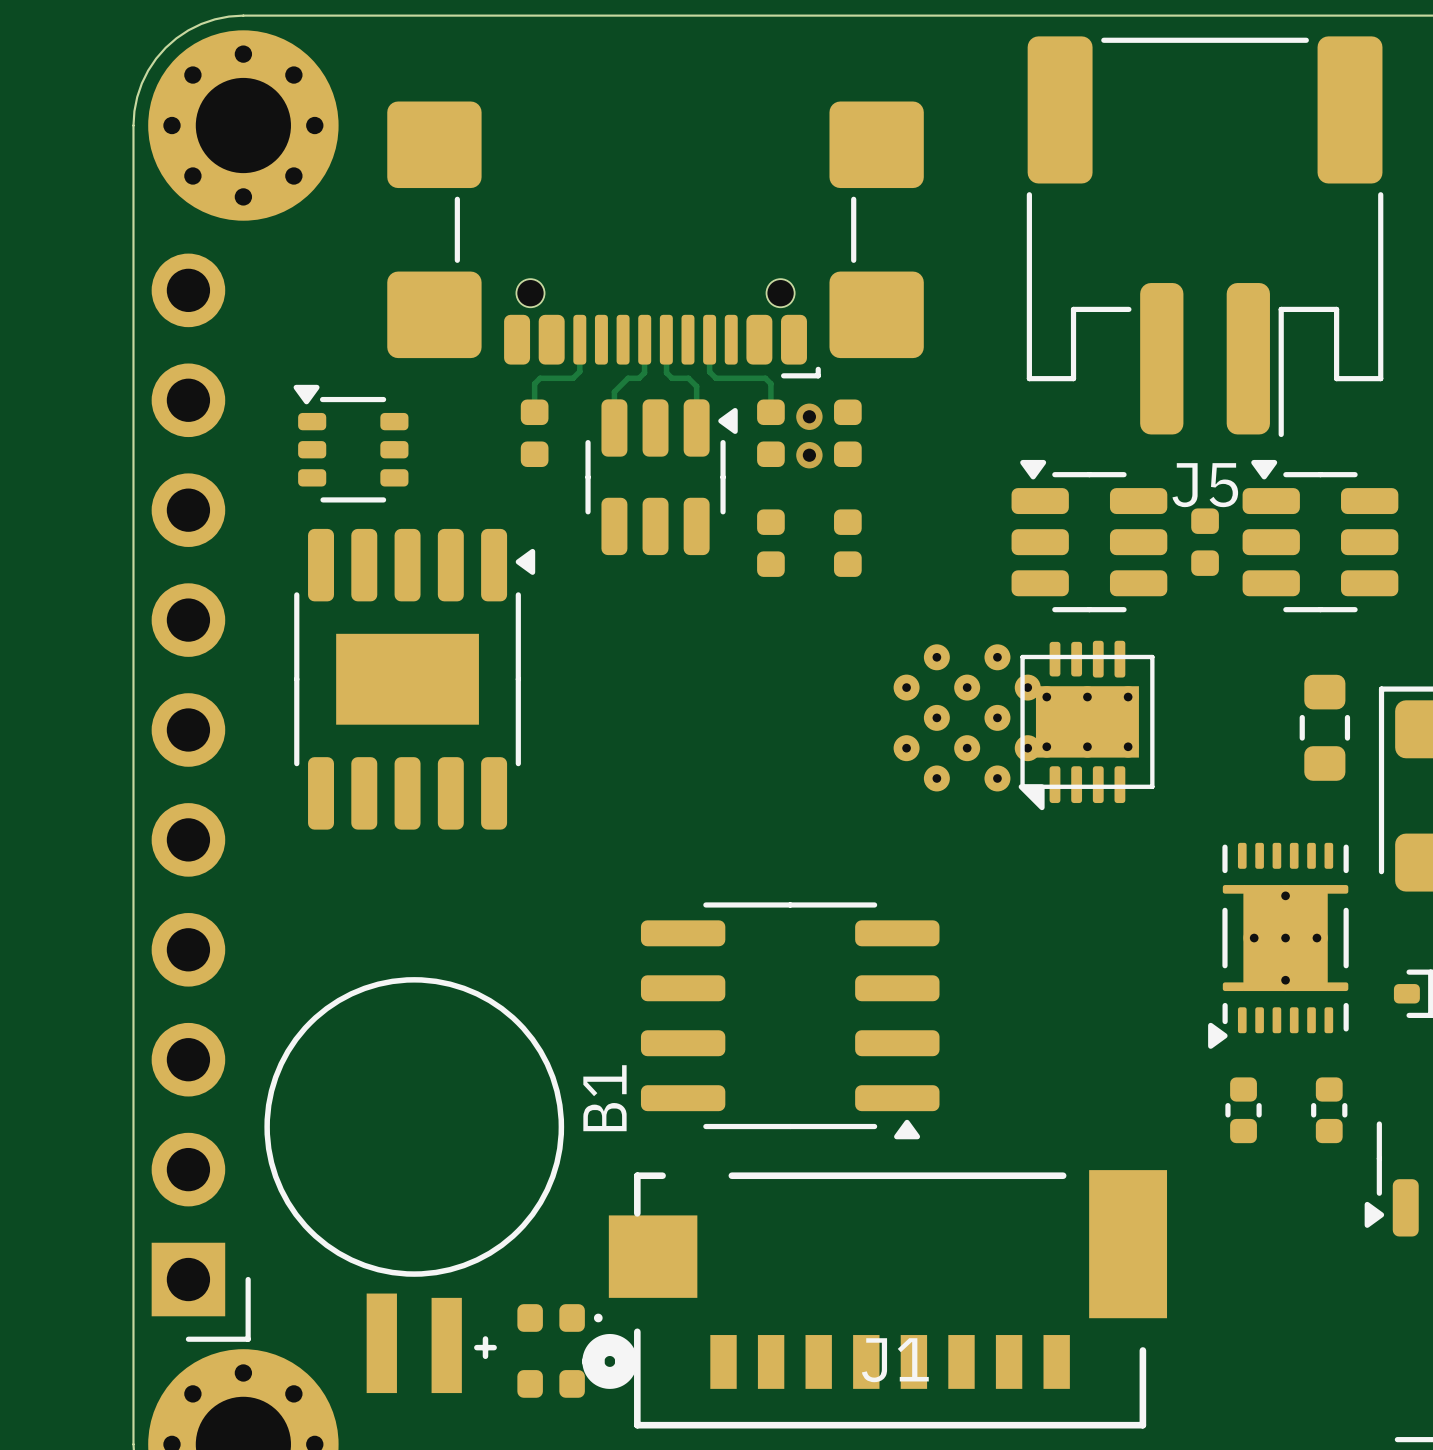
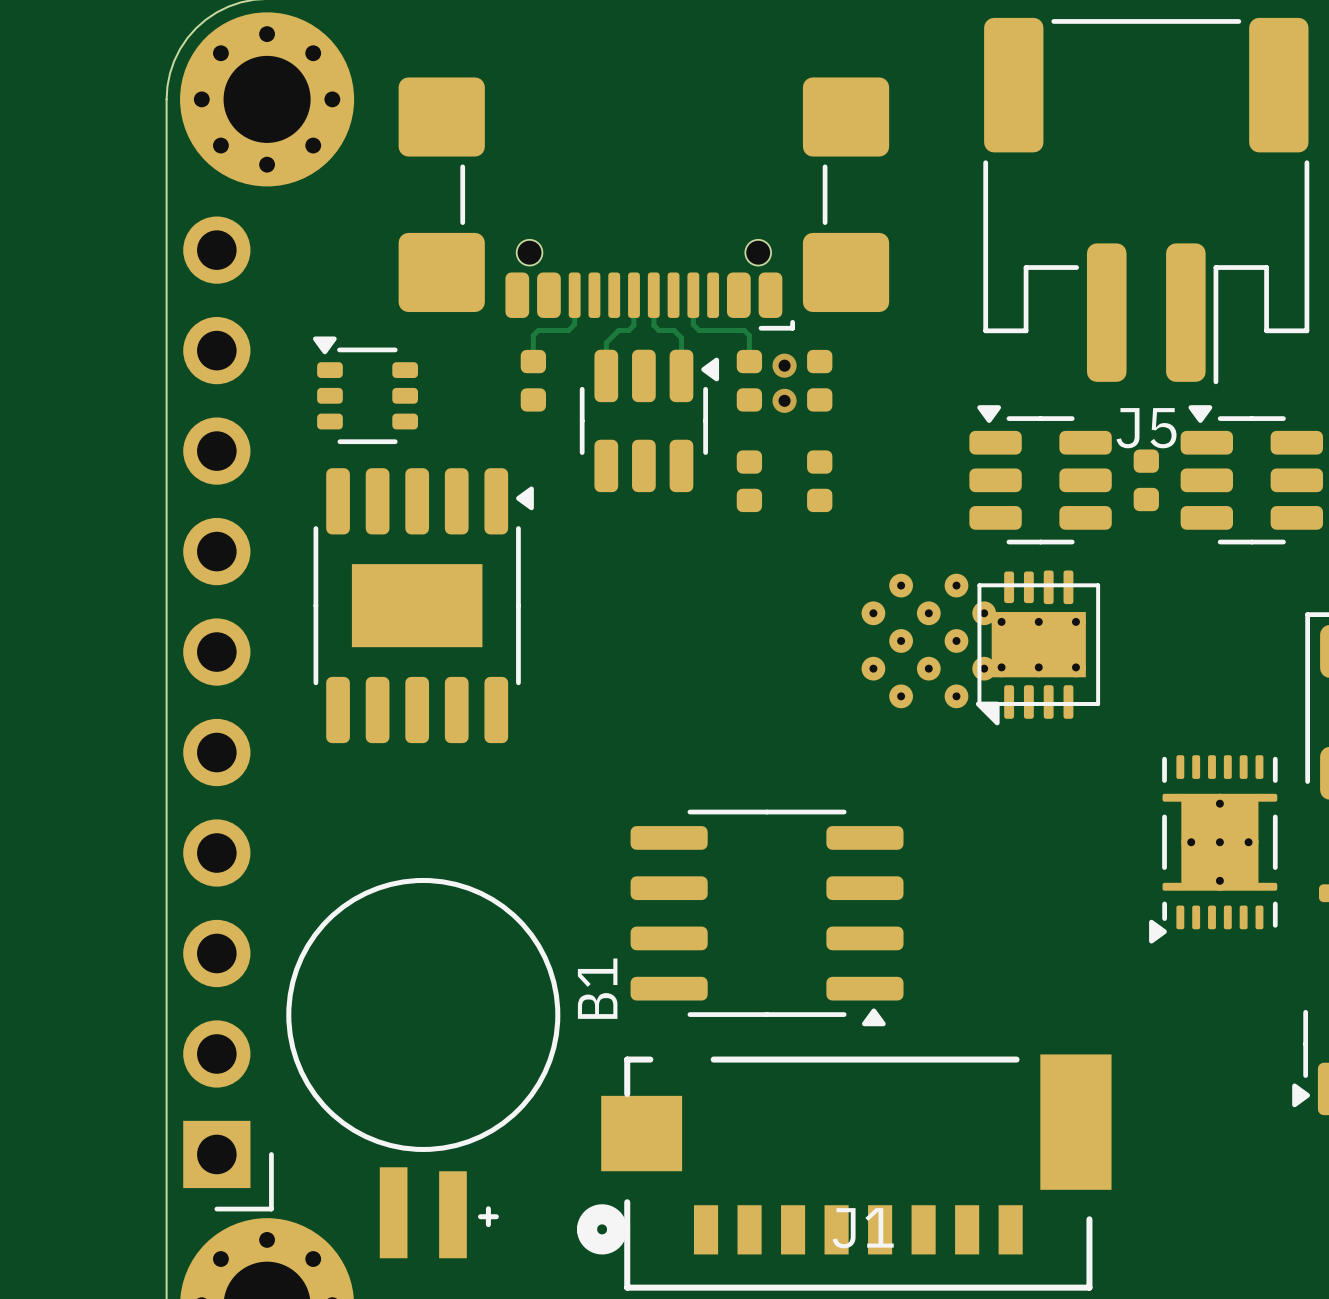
part: (1324, 727) -> none
part: (1243, 1110) -> none
part: (1329, 1110) -> none
part: (559, 1317) -> none
part: (551, 1383) -> none

